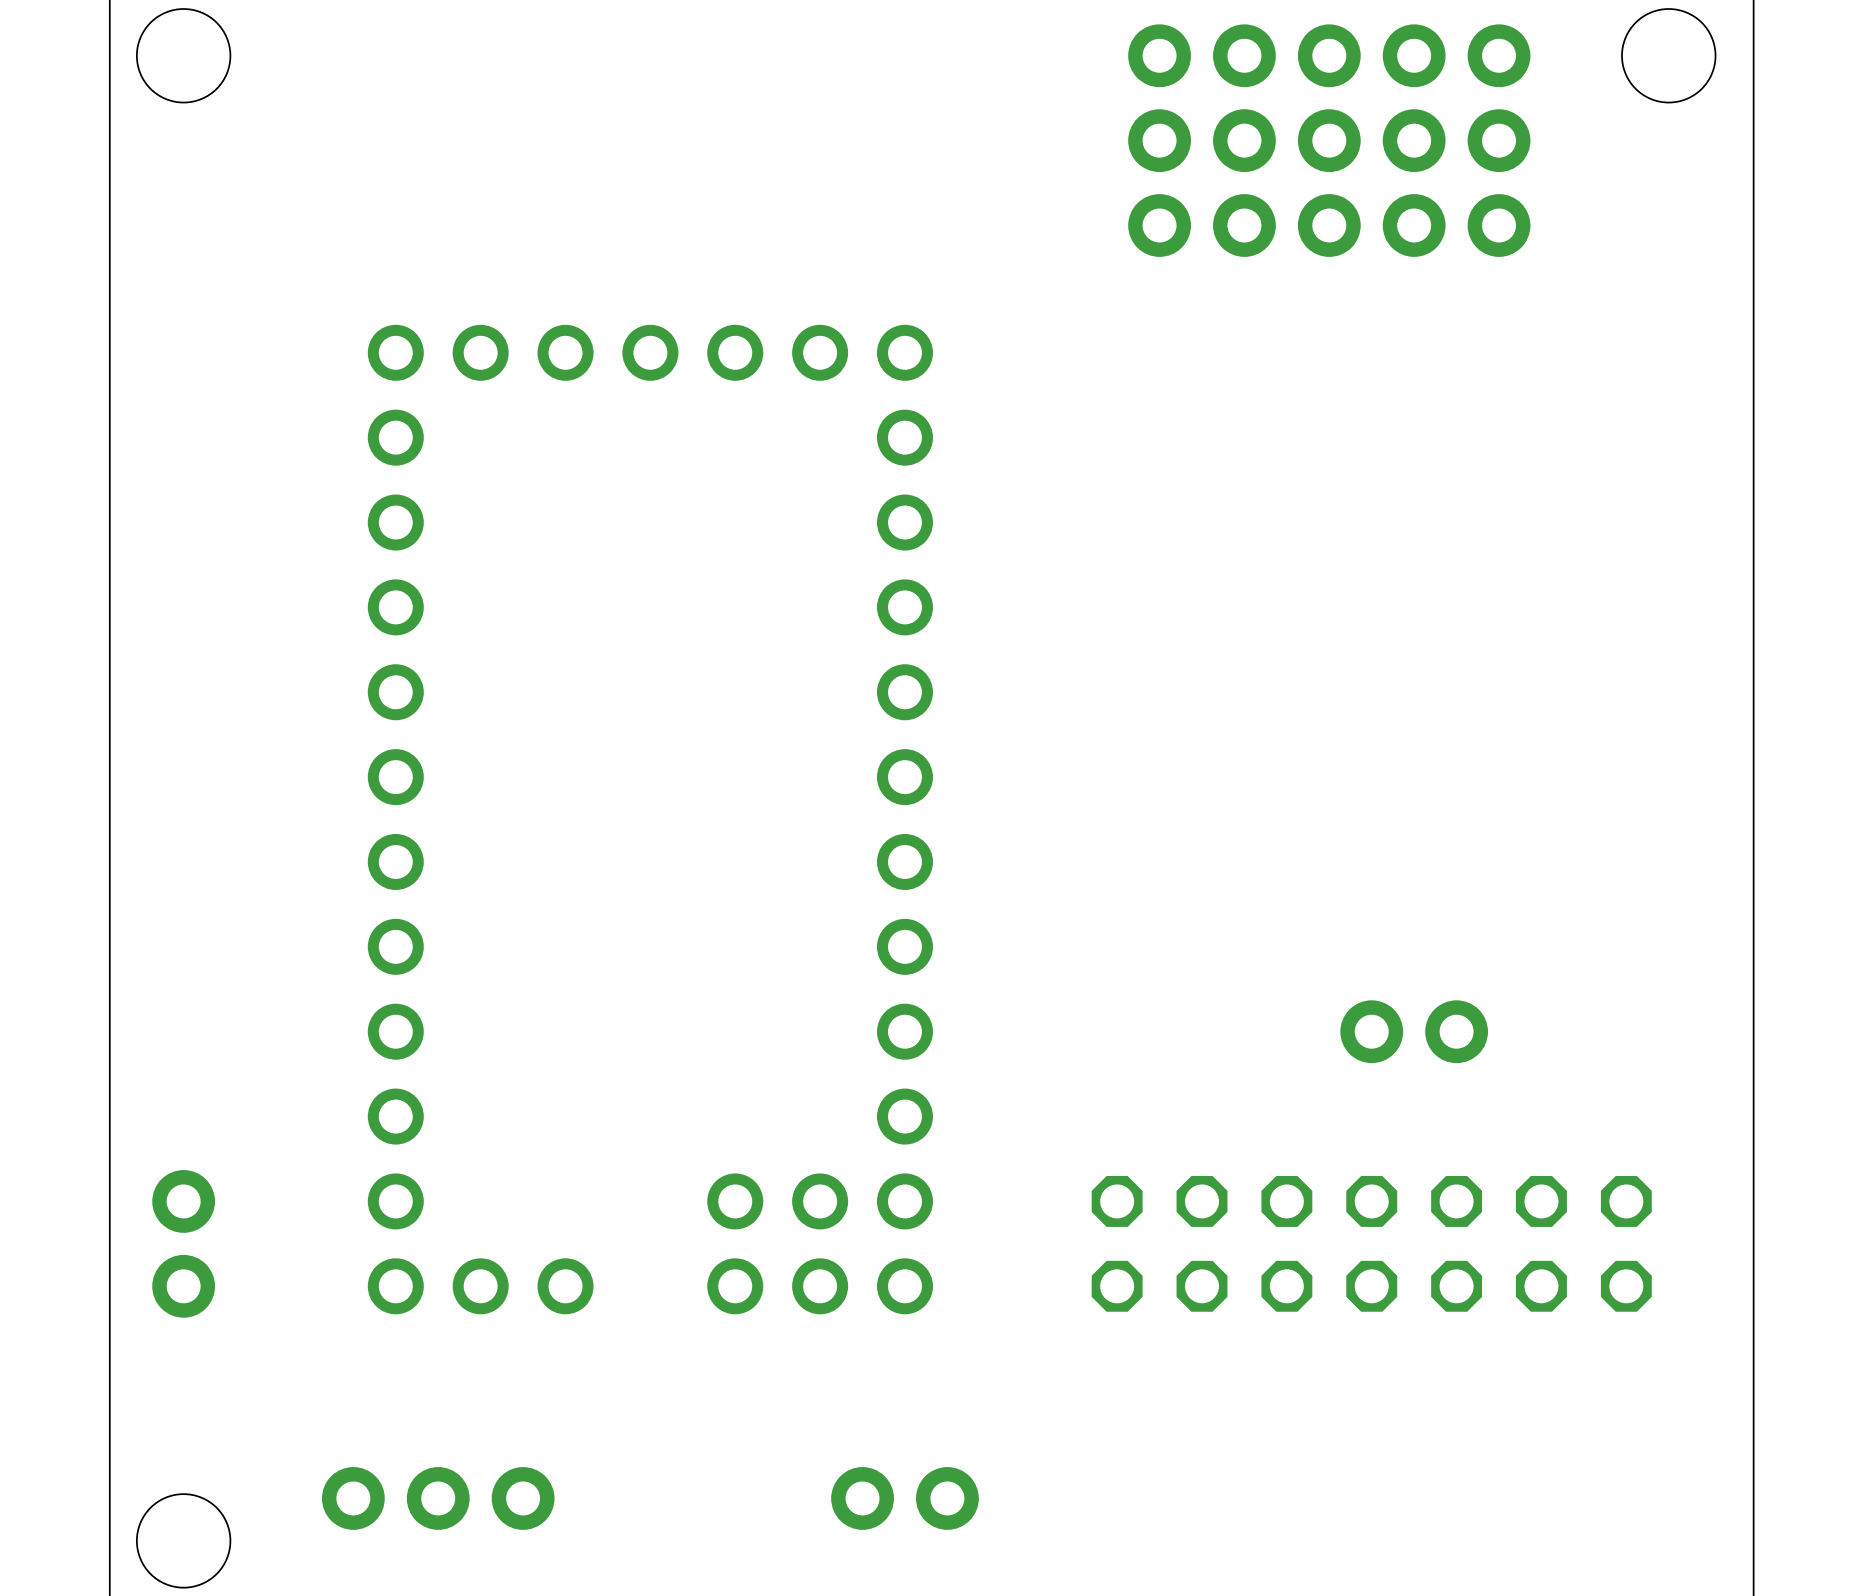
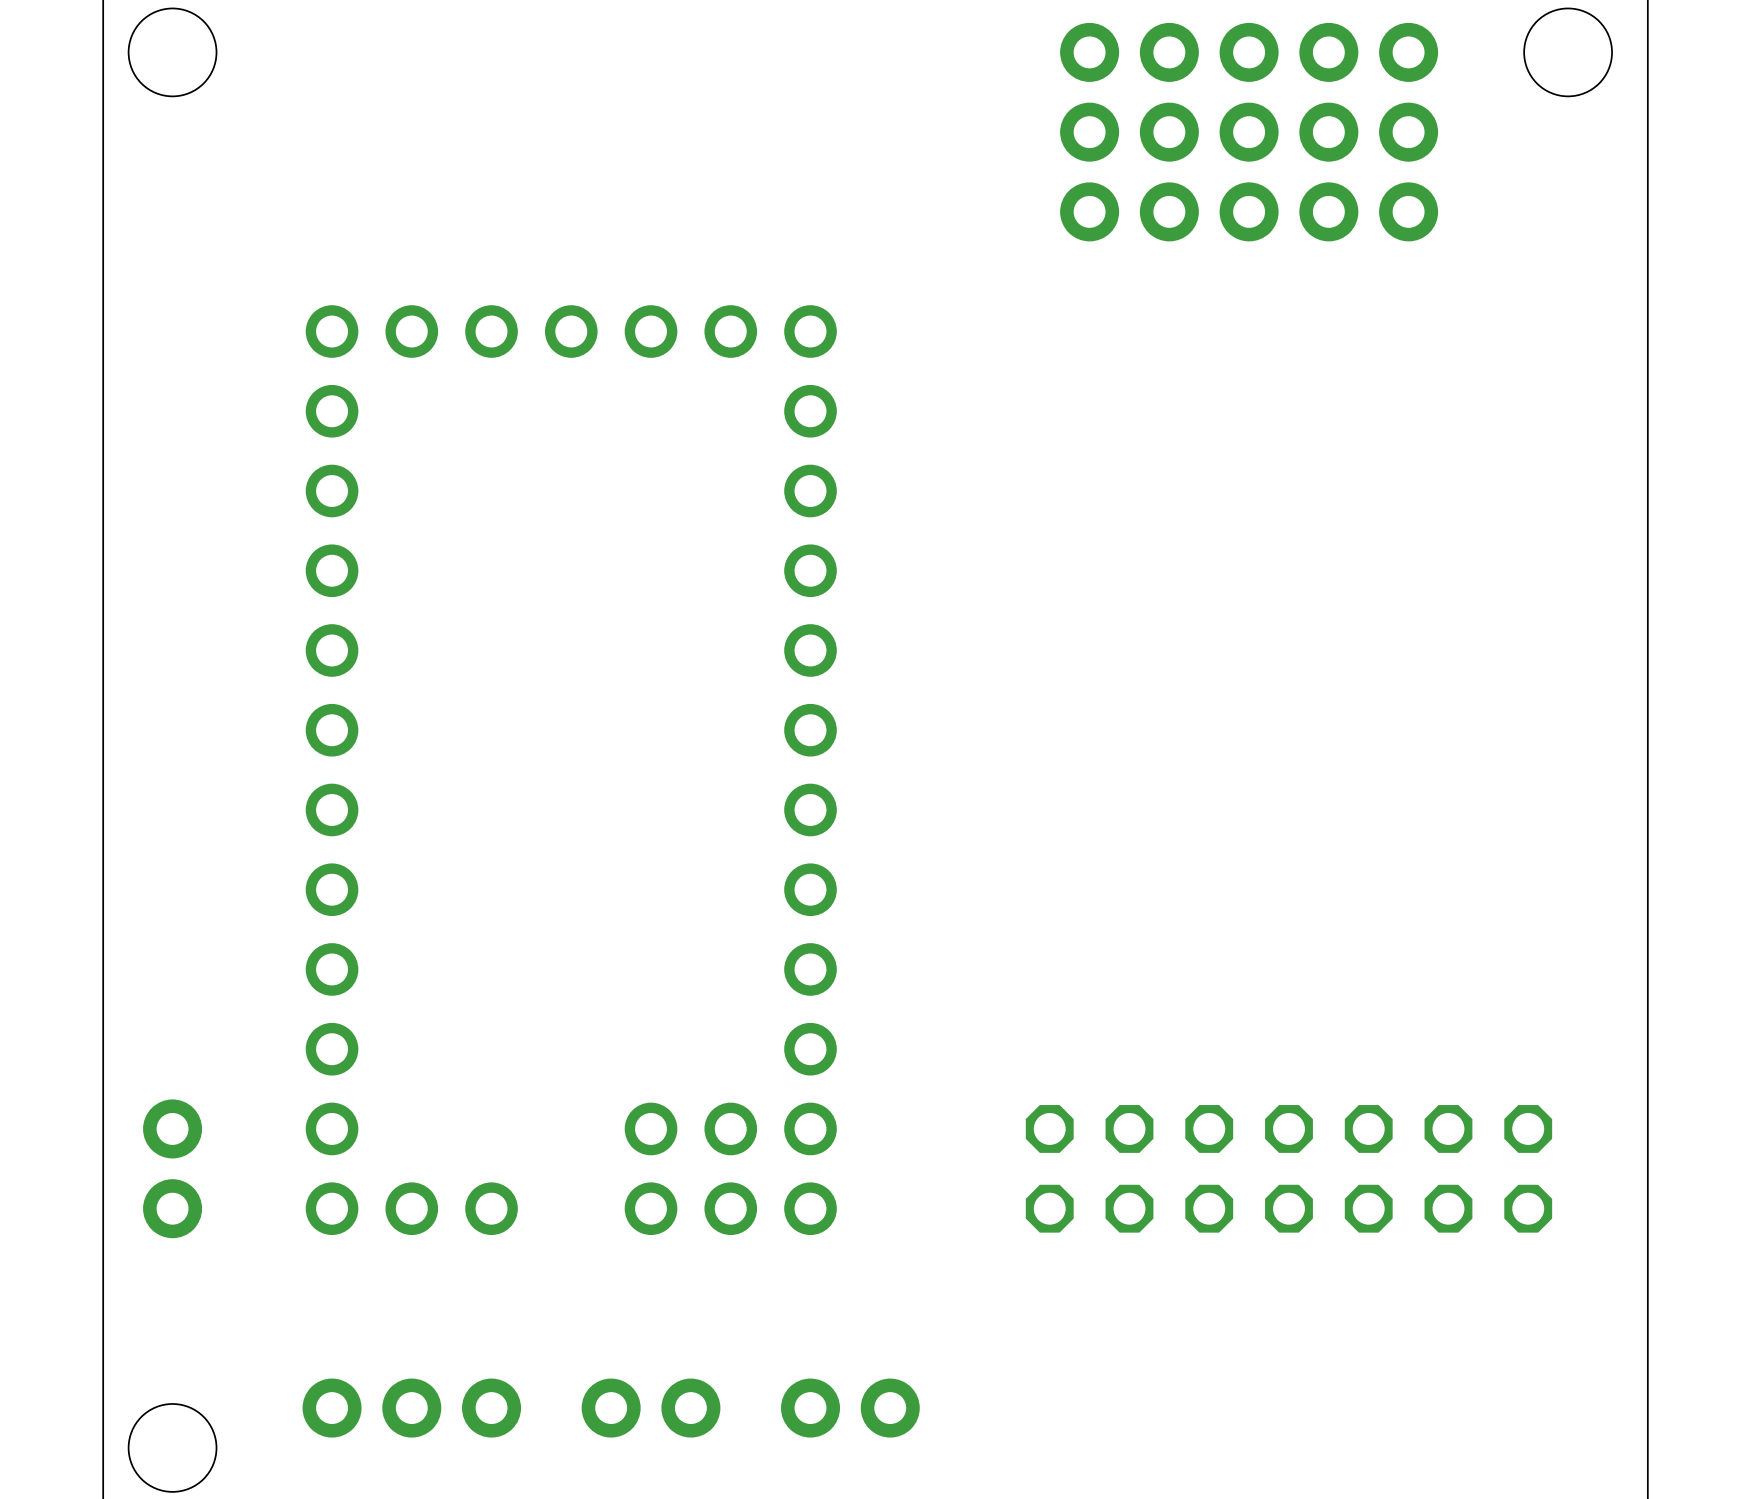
part position: (650, 819) -> (571, 770)
part: (1414, 1031) -> none
part: none -> (651, 1408)

